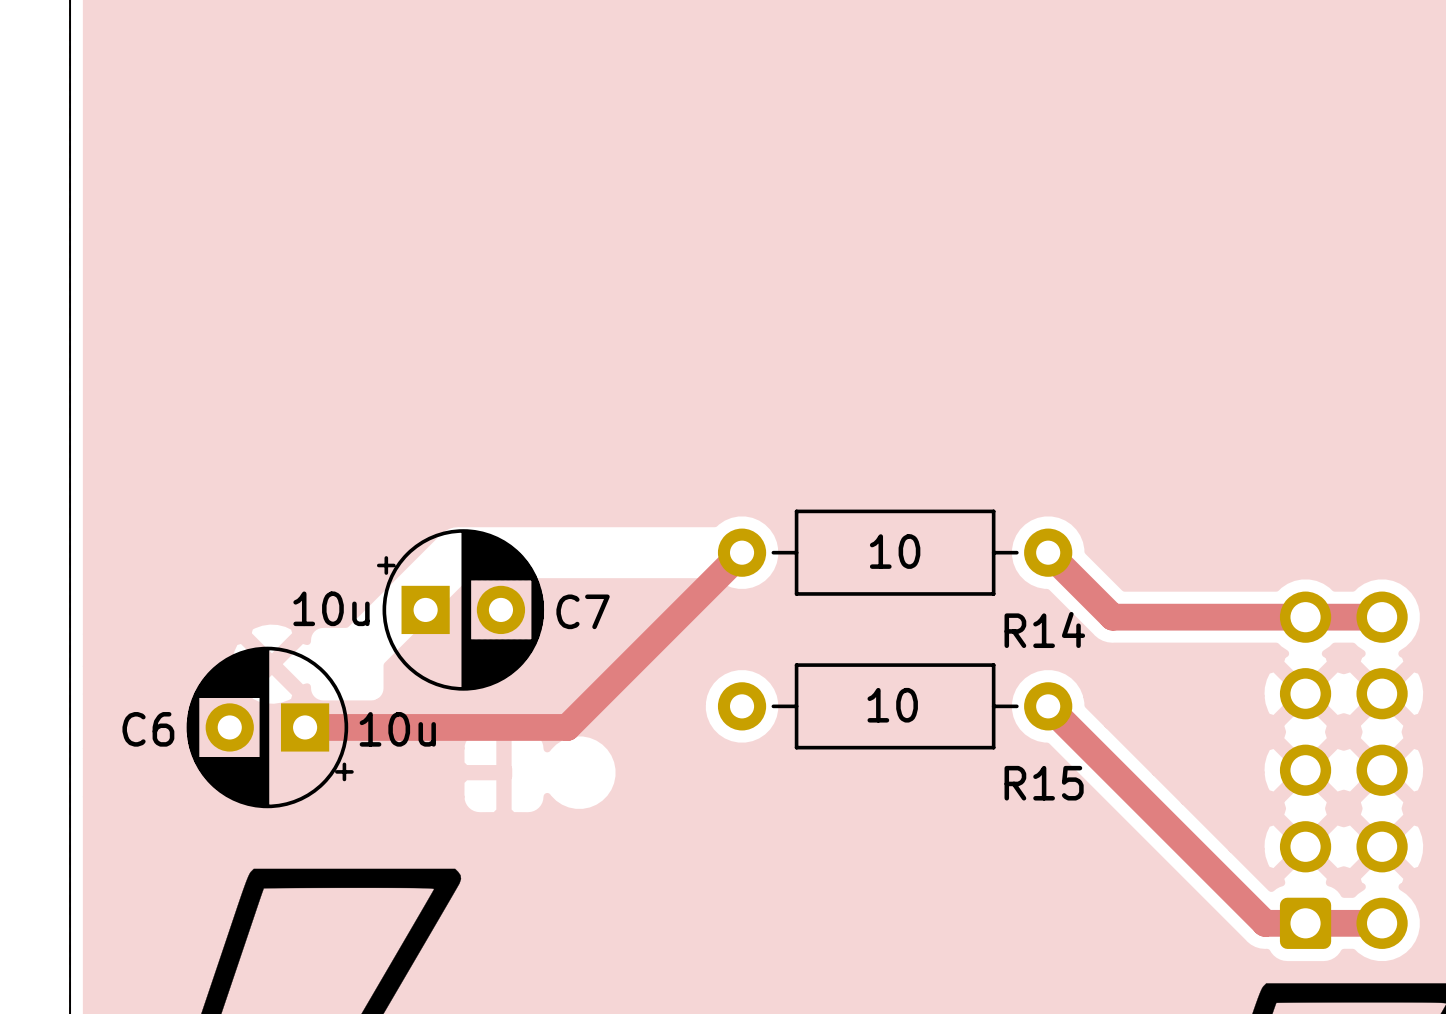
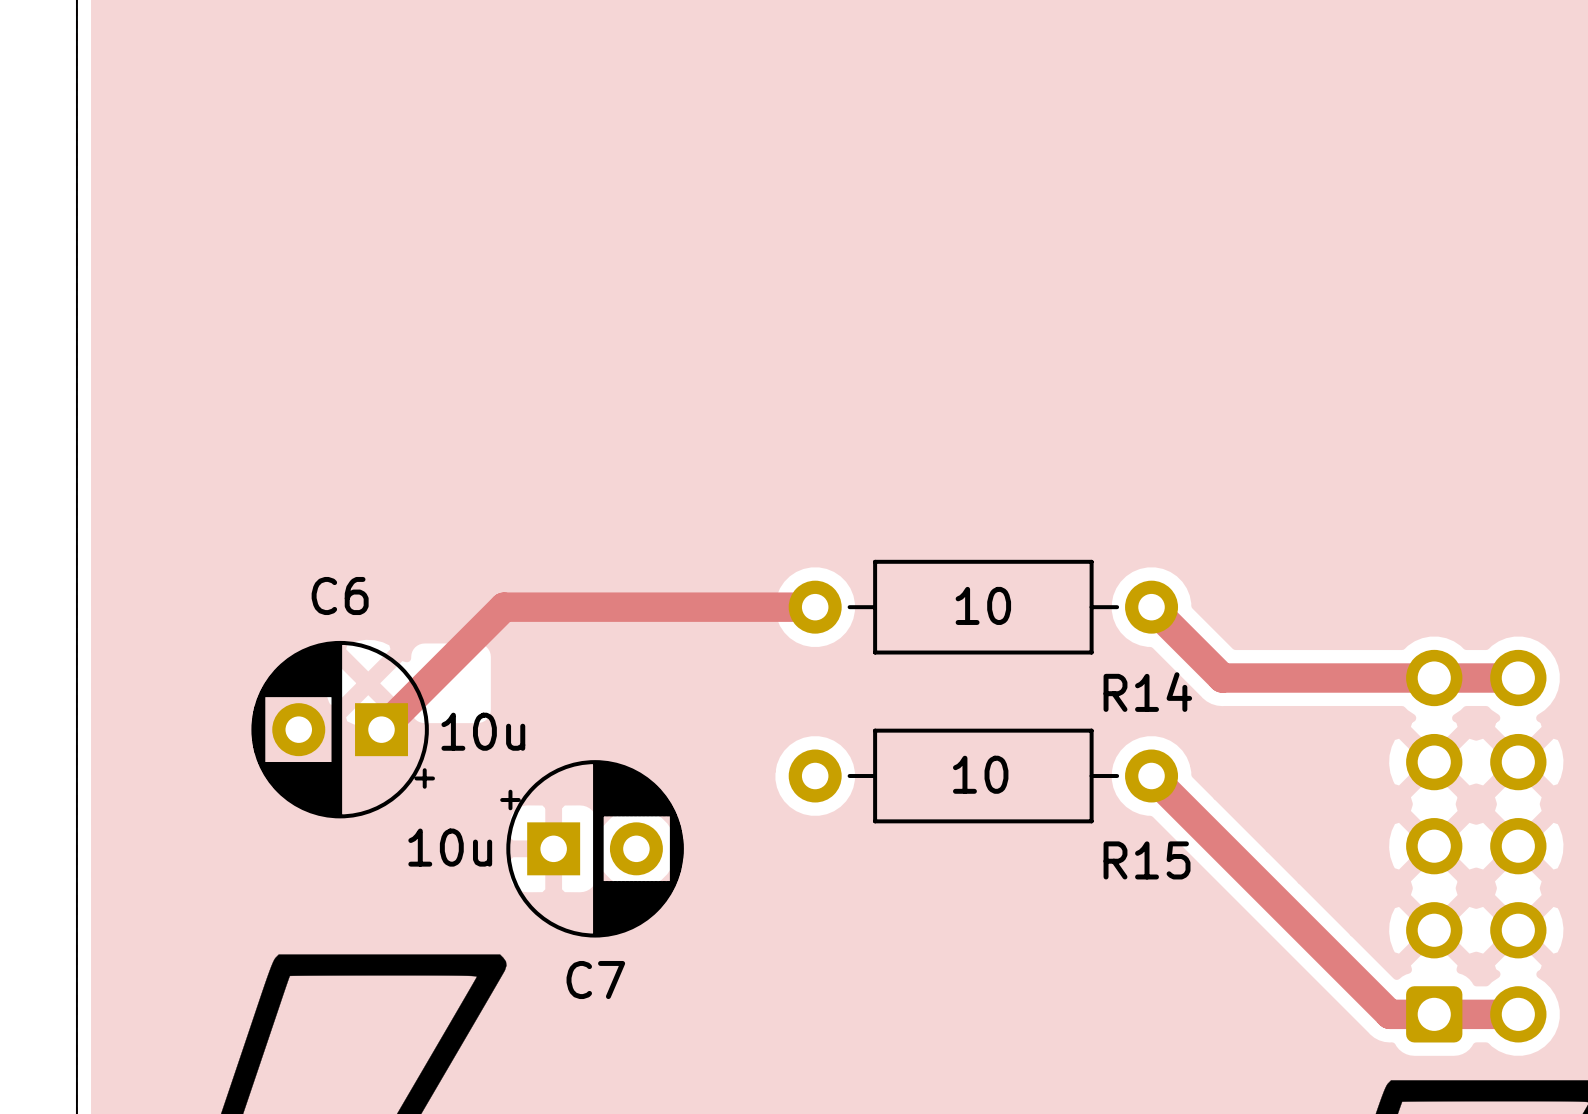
track: (742, 552) (567, 727) (305, 727) -> (815, 607) (504, 607) (381, 729)
C7 position: (460, 609) -> (591, 848)
C7 name position: C7 (583, 611) -> C7 (595, 980)
C6 position: (270, 727) -> (343, 729)
C6 name position: C6 (148, 729) -> C6 (340, 596)

